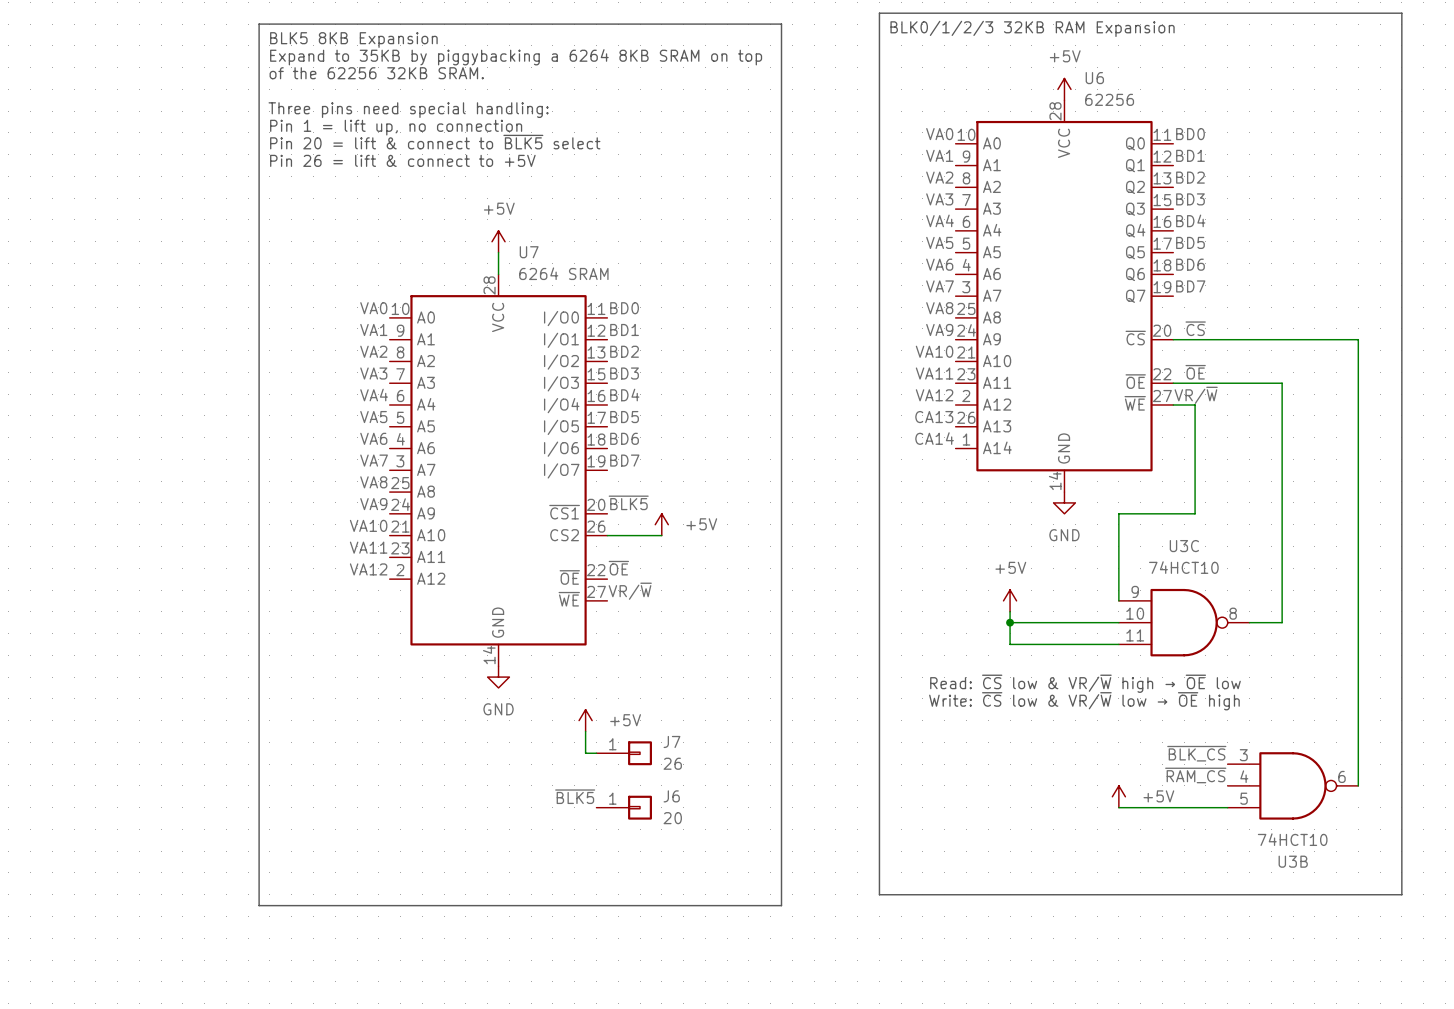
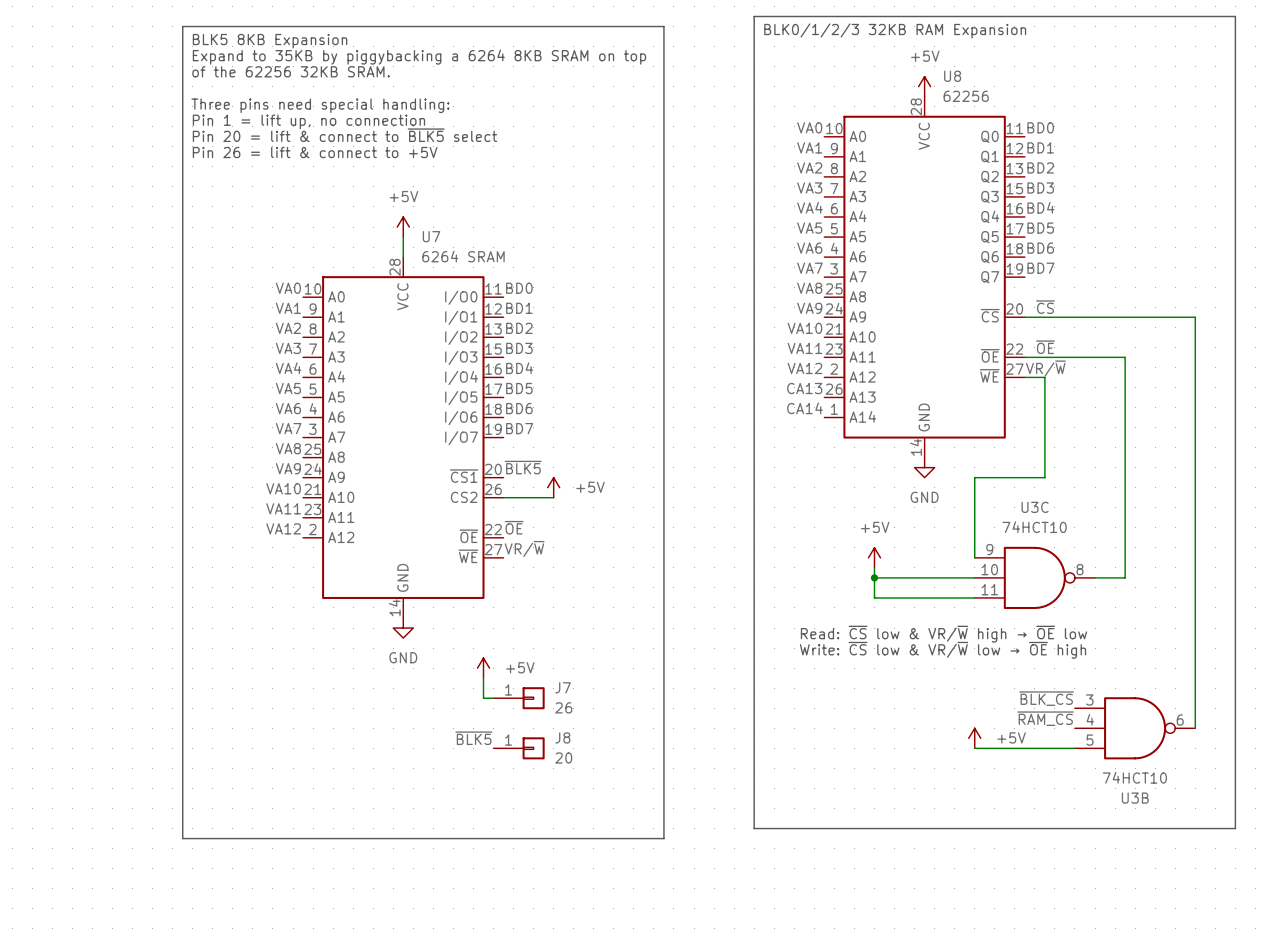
U6 name: U6 (1094, 78) -> U8 (952, 76)
J6 name: J6 (671, 796) -> J8 (562, 737)

